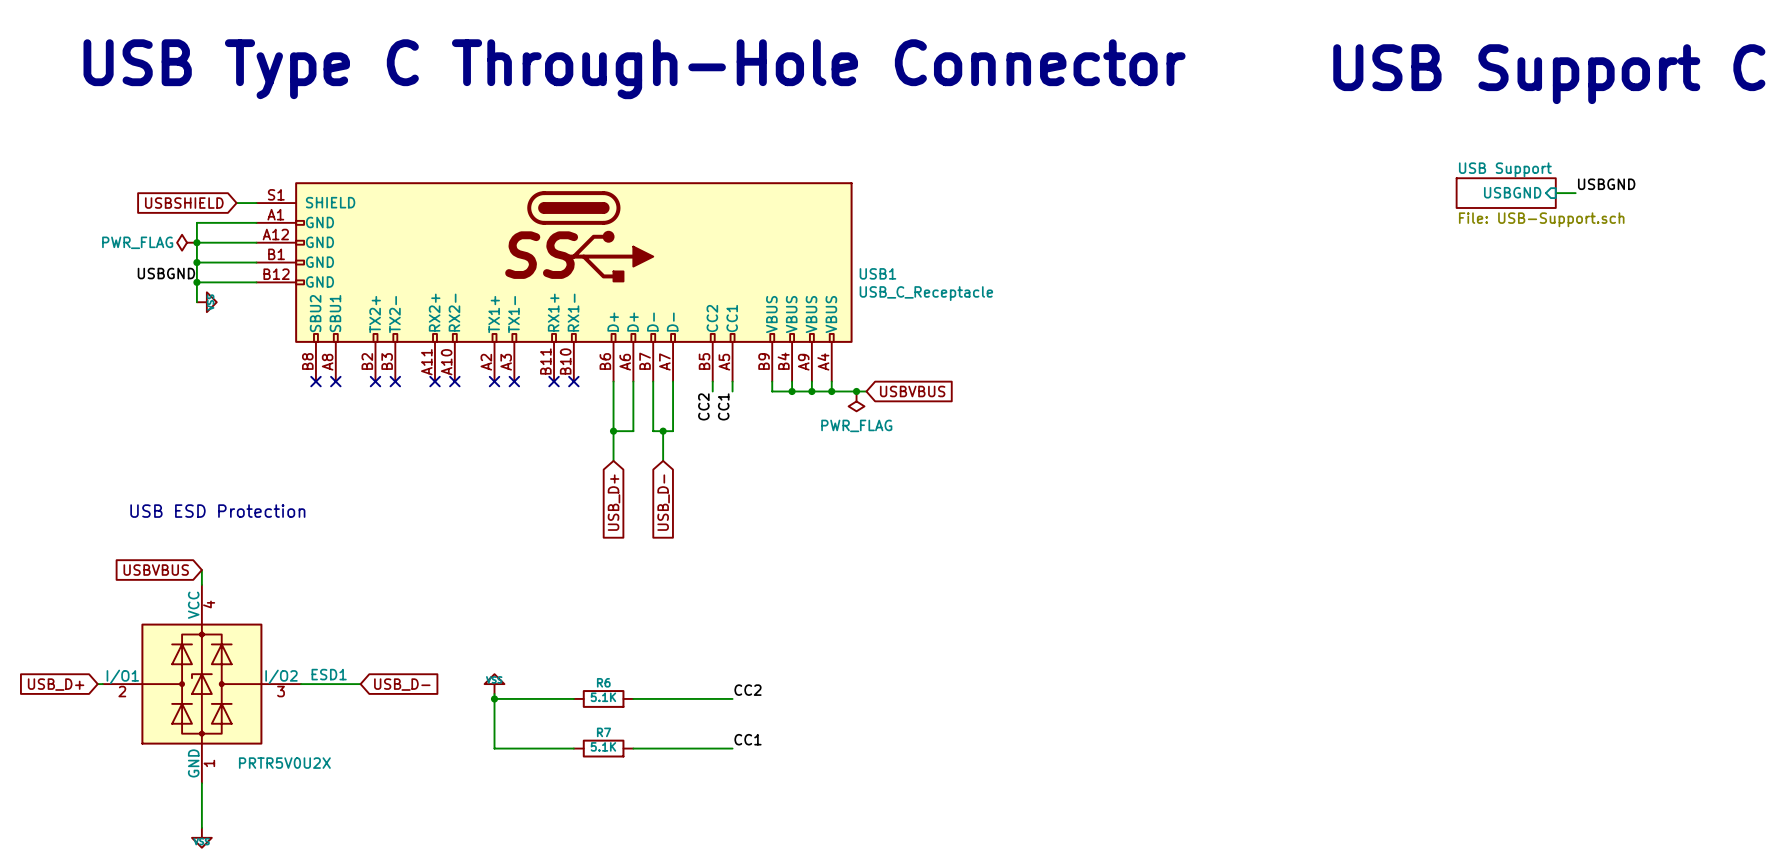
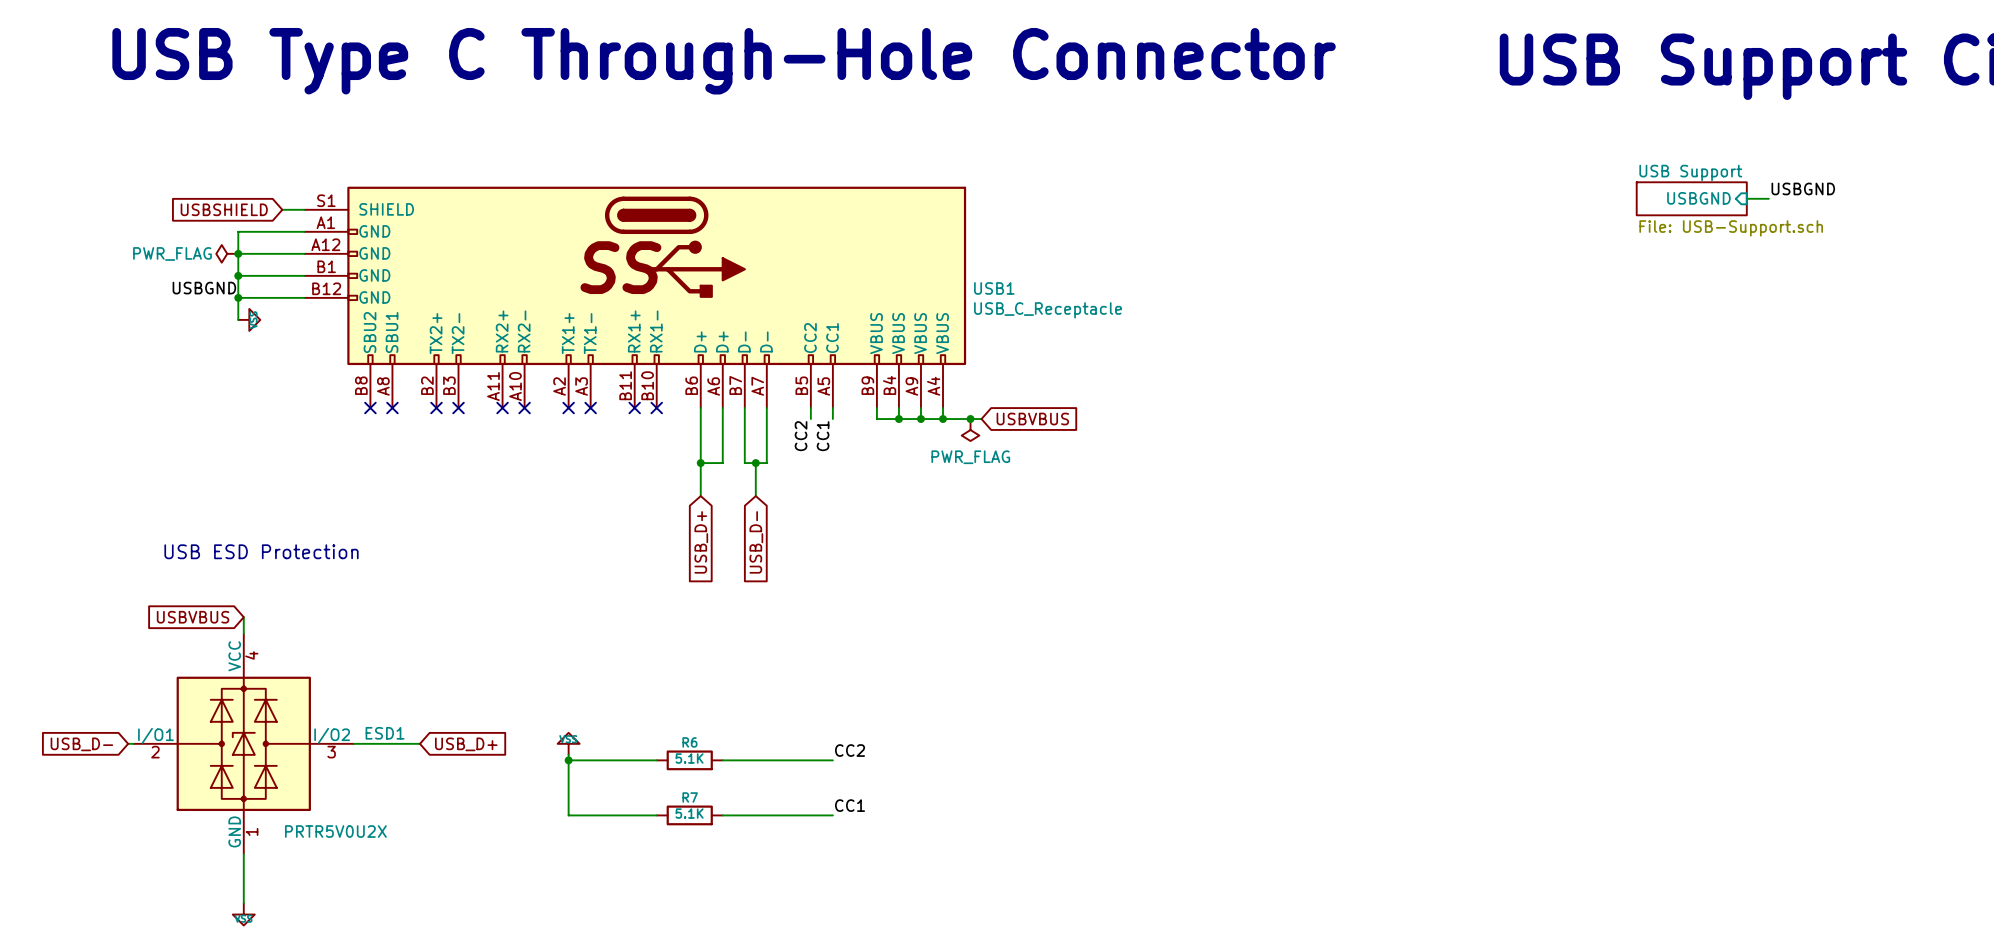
global label: USB_D+ (56, 684) -> USB_D- (81, 744)
global label: USB_D- (402, 684) -> USB_D+ (466, 744)

